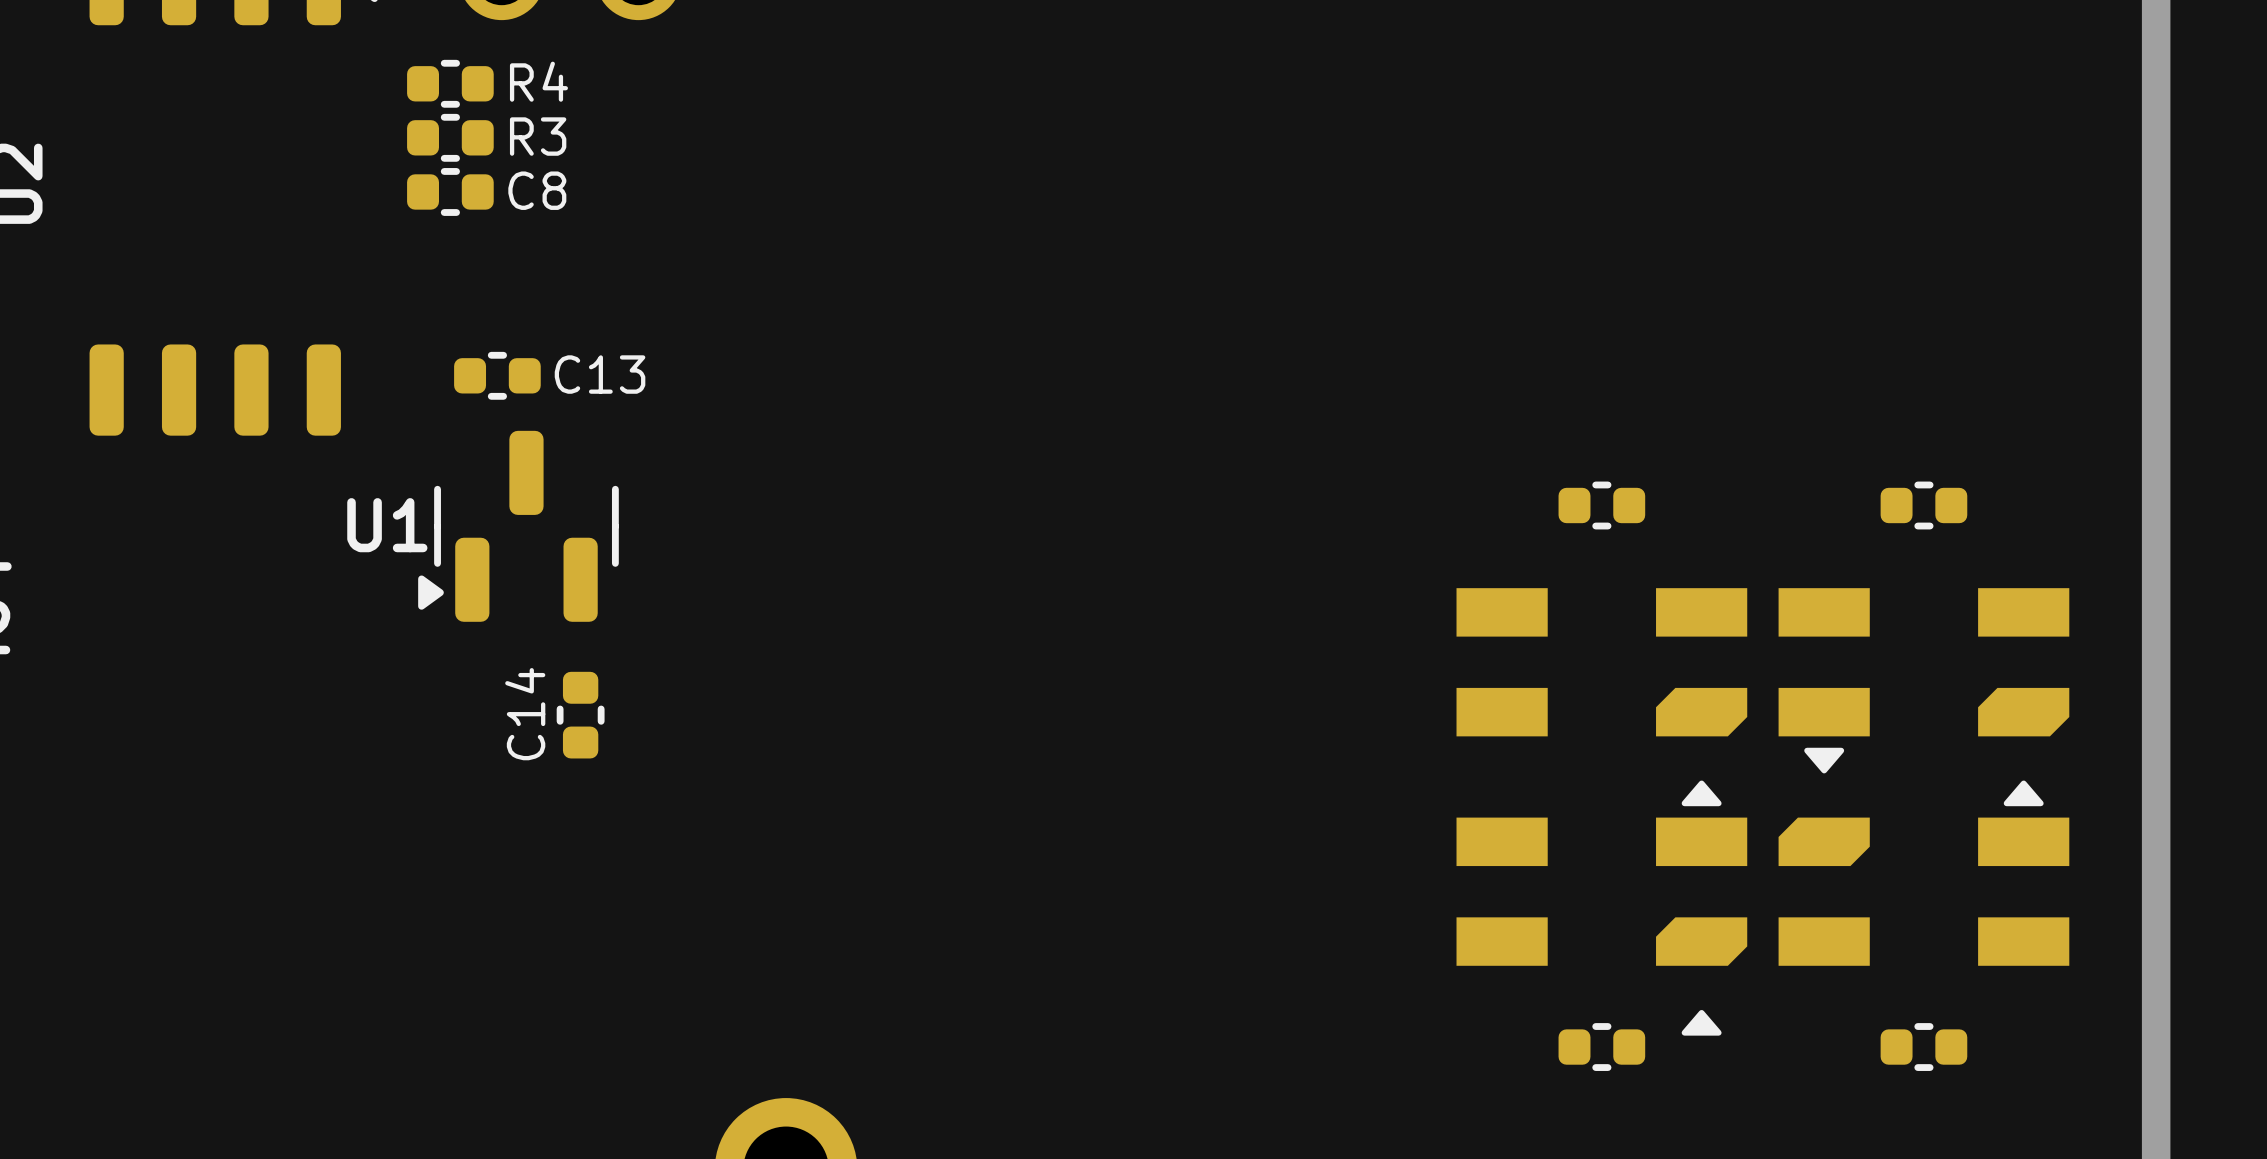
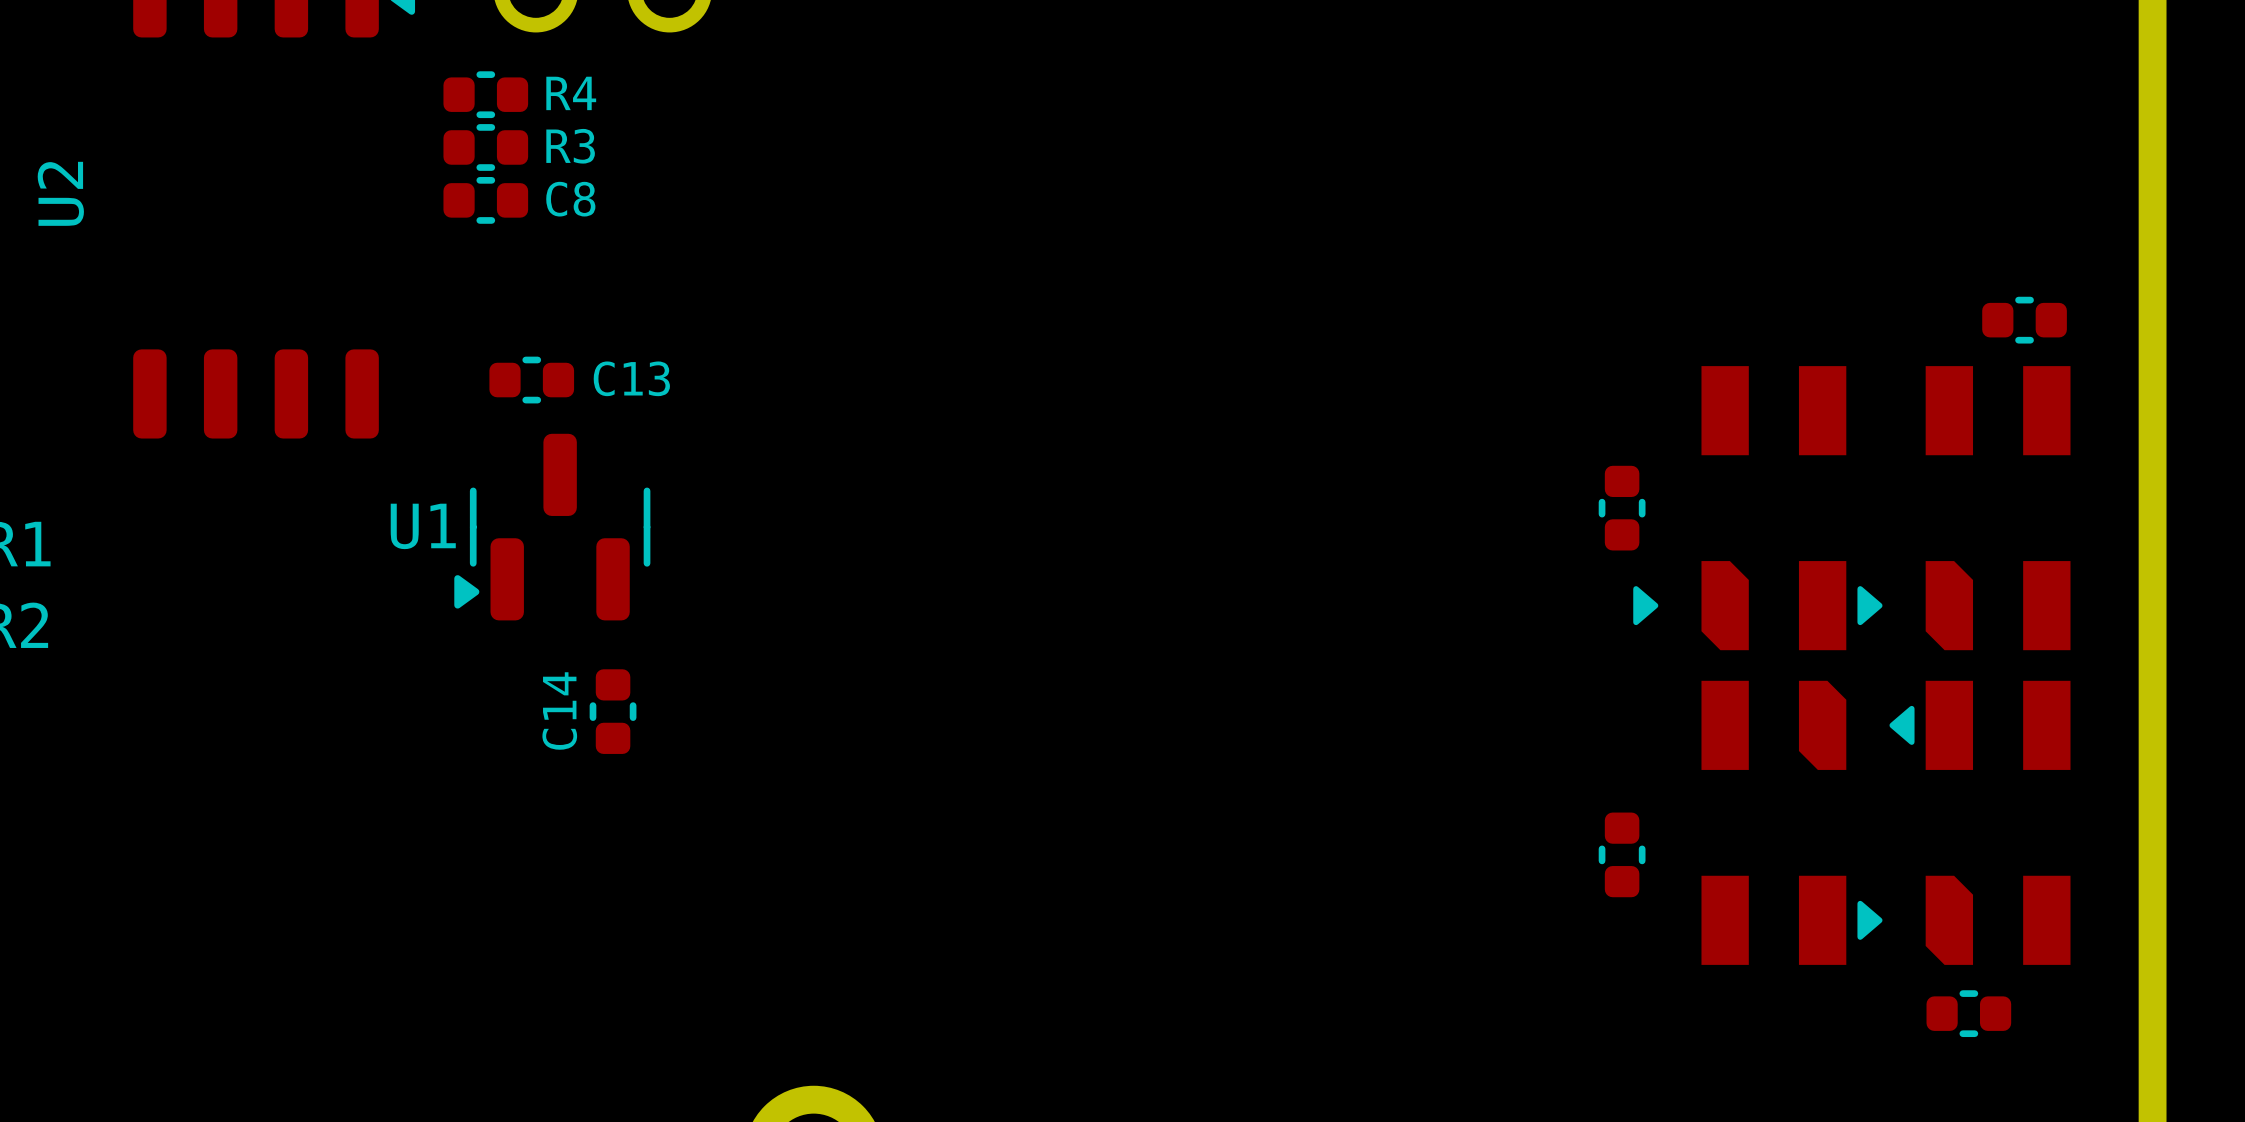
part: none -> (2024, 320)
part footprint: [1880, 481, 1968, 530] -> [1857, 366, 2071, 651]
part rotation: 0° (1601, 505) -> 90° clockwise (1622, 508)
part: none -> (1739, 508)
part: (1601, 697) -> none
part: (1923, 697) -> none
part: none -> (1808, 822)
part rotation: 0° (1923, 856) -> 90° counterclockwise (1963, 822)
part: (1601, 926) -> none
part rotation: 0° (1601, 1047) -> 90° clockwise (1622, 854)
part position: (1601, 1047) -> (1622, 854)
part position: (1923, 1047) -> (1968, 1013)

